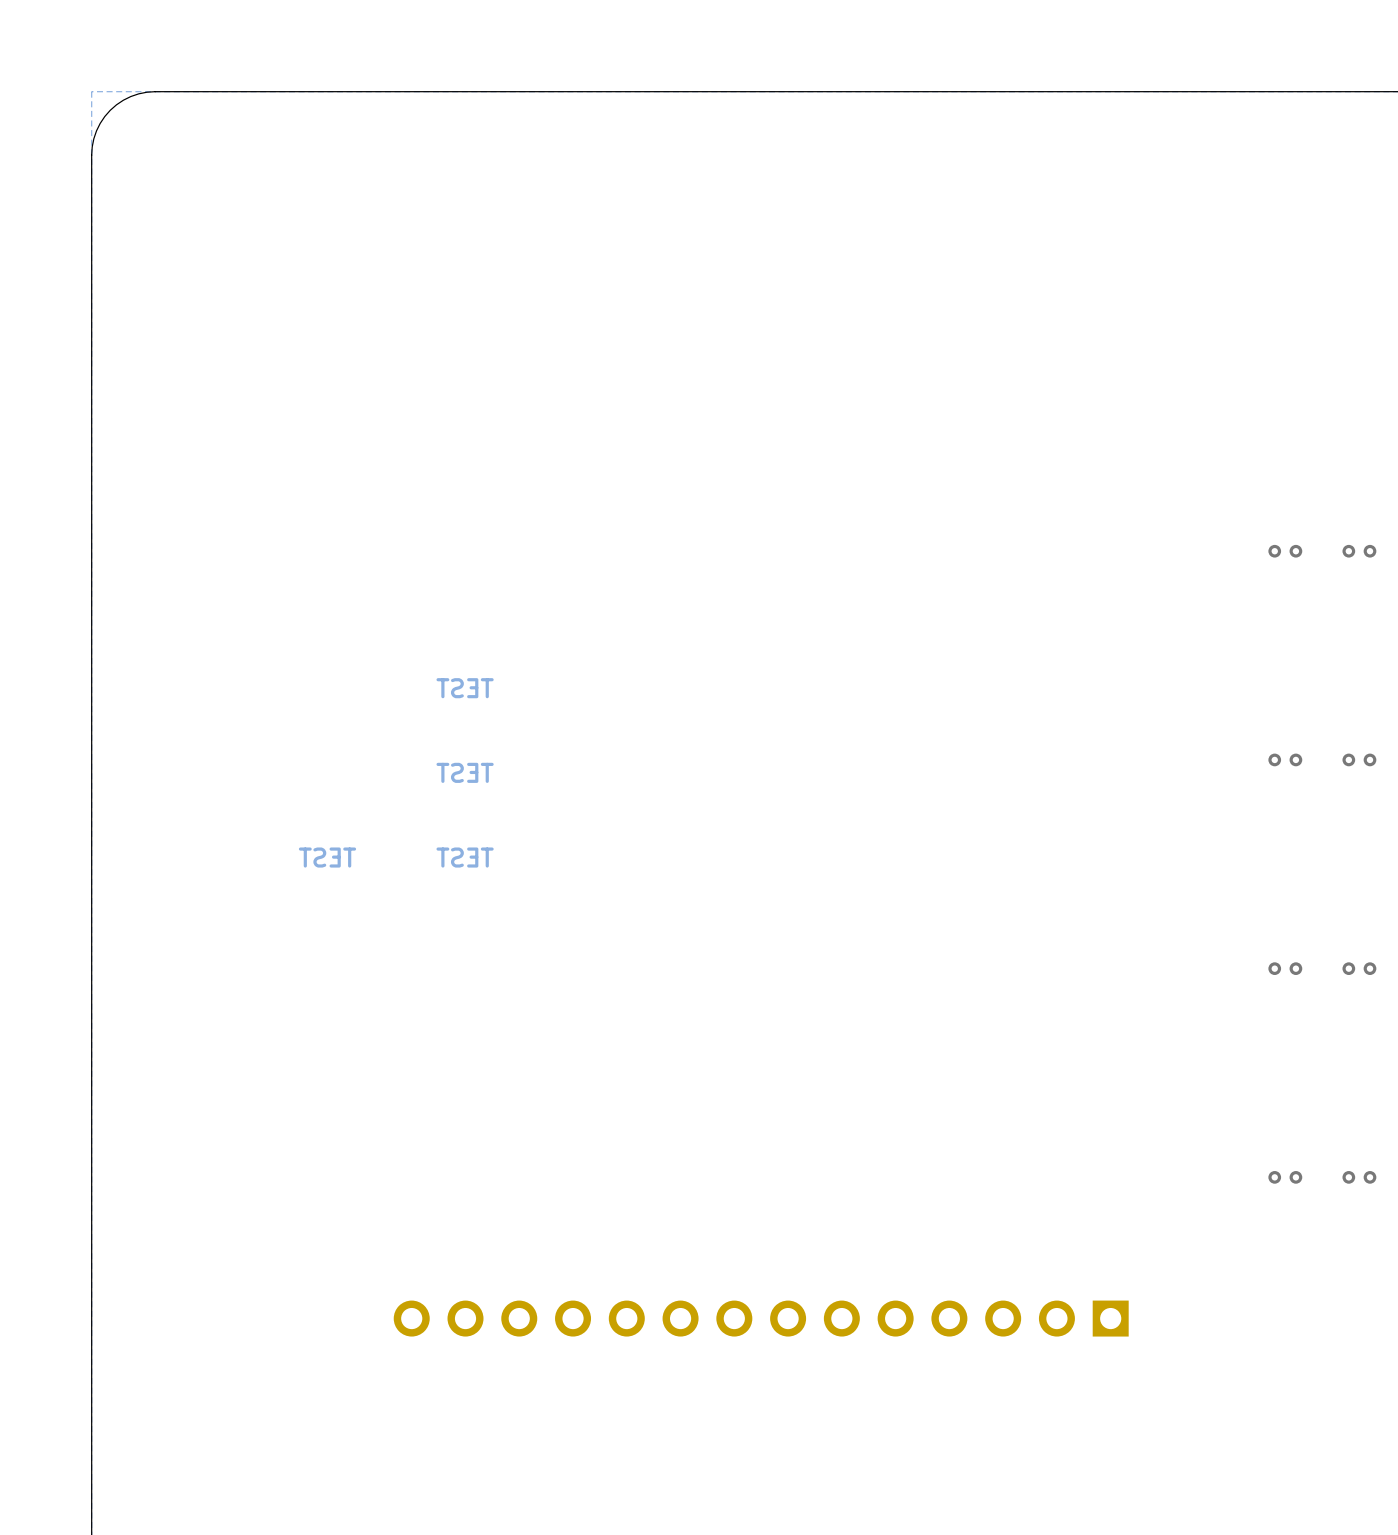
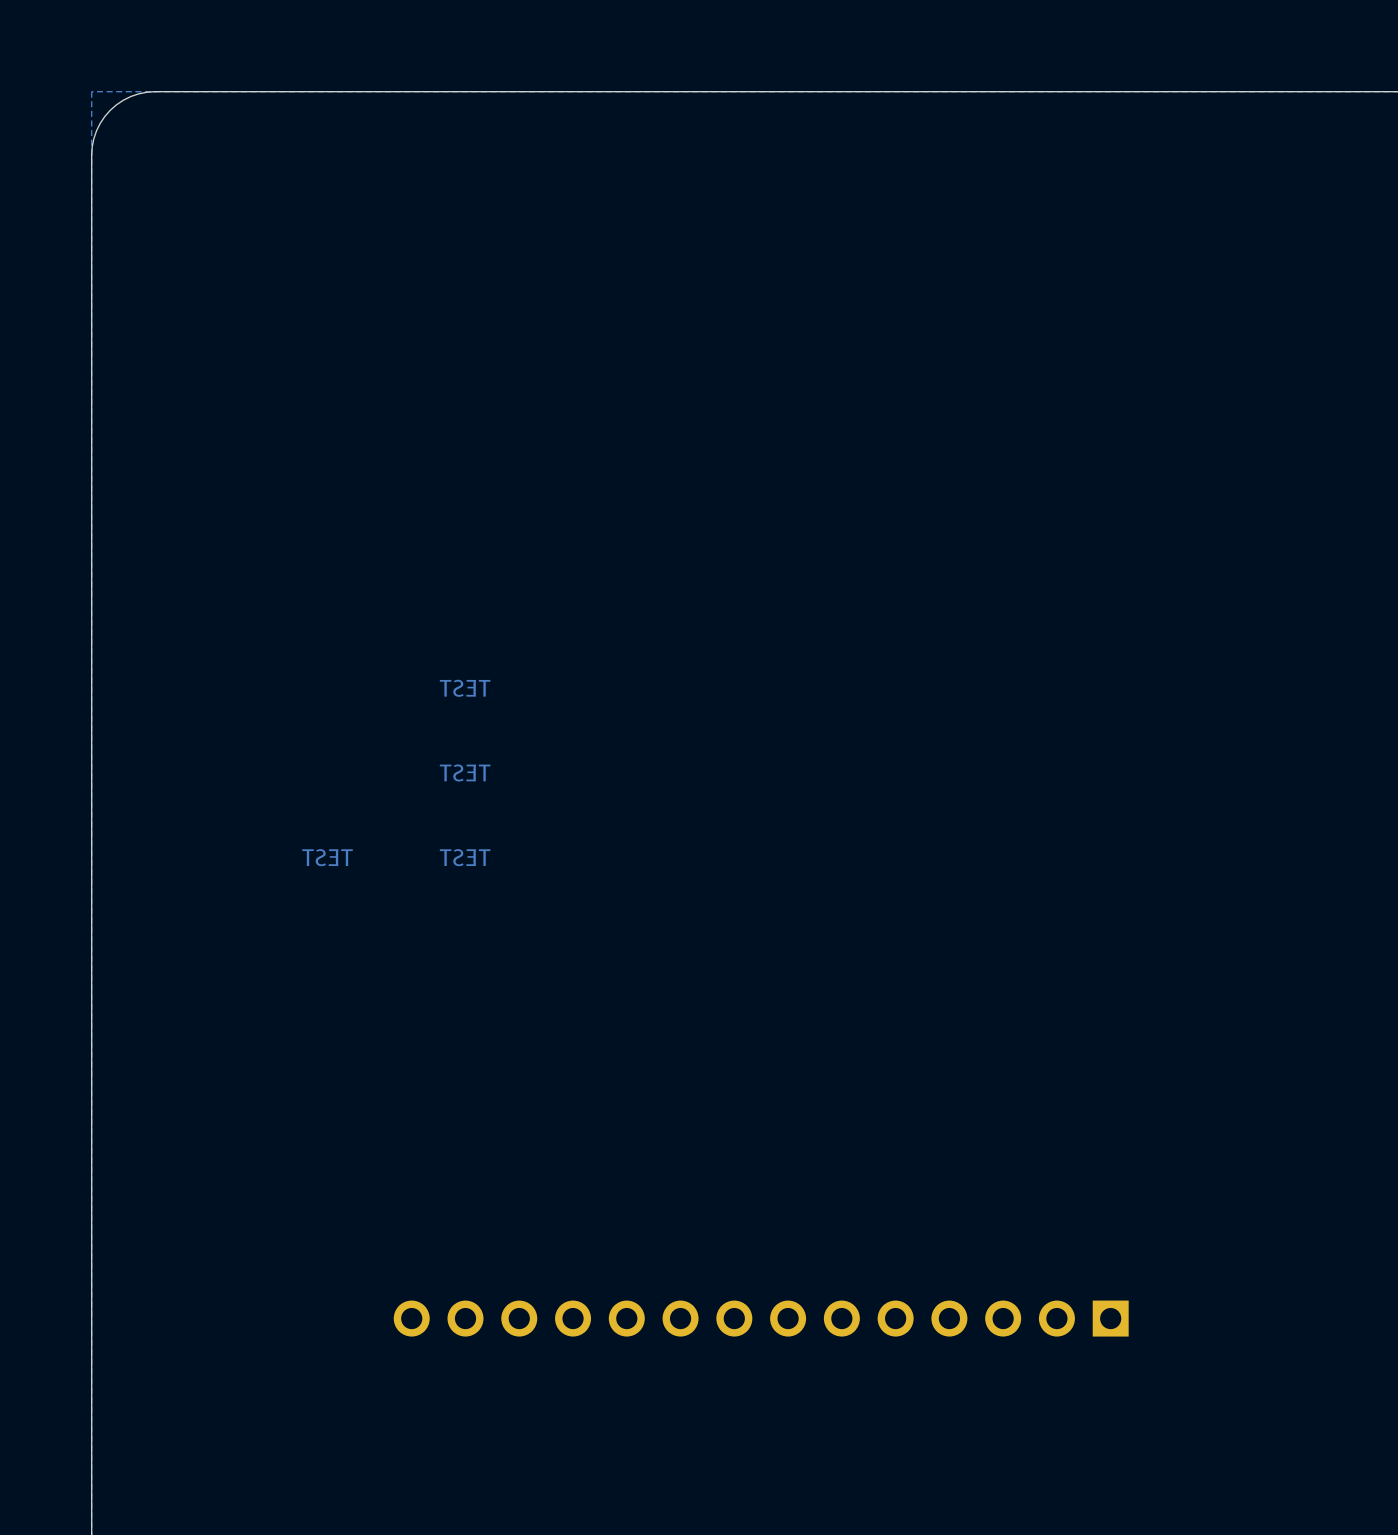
via: (1274, 551) -> none
via: (1295, 551) -> none
via: (1348, 551) -> none
via: (1369, 551) -> none
via: (1274, 759) -> none
via: (1295, 759) -> none
via: (1348, 759) -> none
via: (1369, 759) -> none
via: (1274, 968) -> none
via: (1295, 968) -> none
via: (1348, 968) -> none
via: (1369, 968) -> none
via: (1274, 1177) -> none
via: (1295, 1177) -> none
via: (1348, 1177) -> none
via: (1369, 1177) -> none

